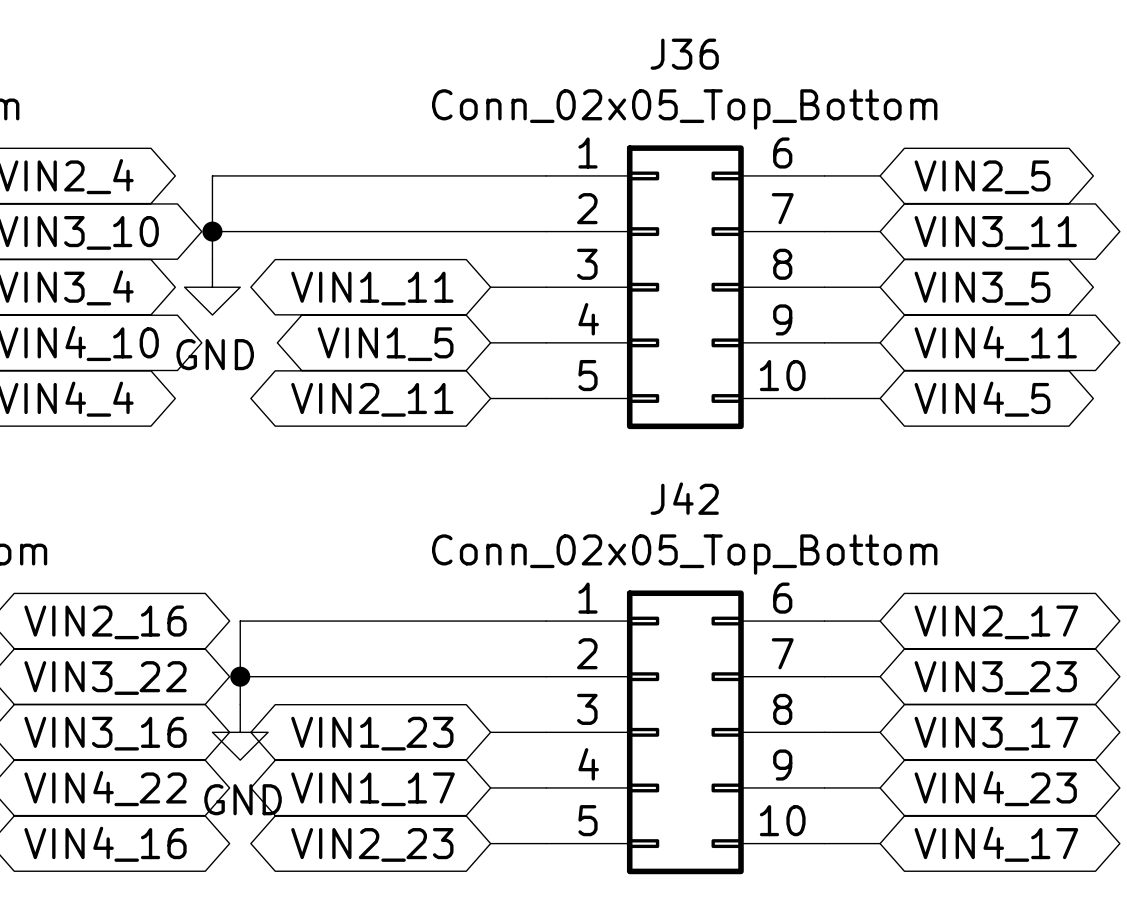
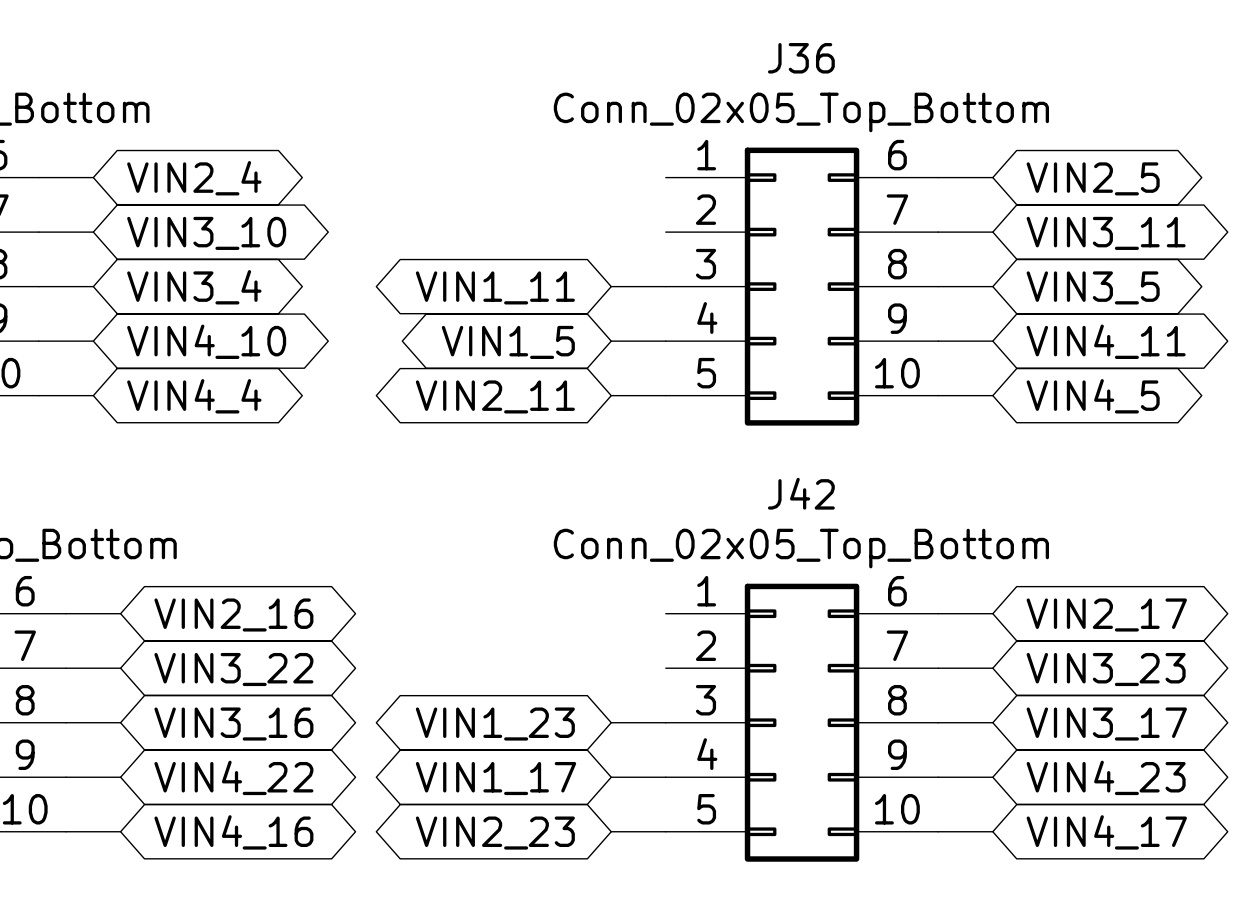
wire: (546, 175) (212, 175) (212, 259) -> none
wire: (212, 231) (546, 231) -> none
junction: (212, 231) -> none
power symbol: GND (212, 287) -> none
wire: (546, 621) (240, 621) (240, 704) -> none
wire: (240, 676) (546, 676) -> none
junction: (240, 676) -> none
power symbol: GND (240, 732) -> none

